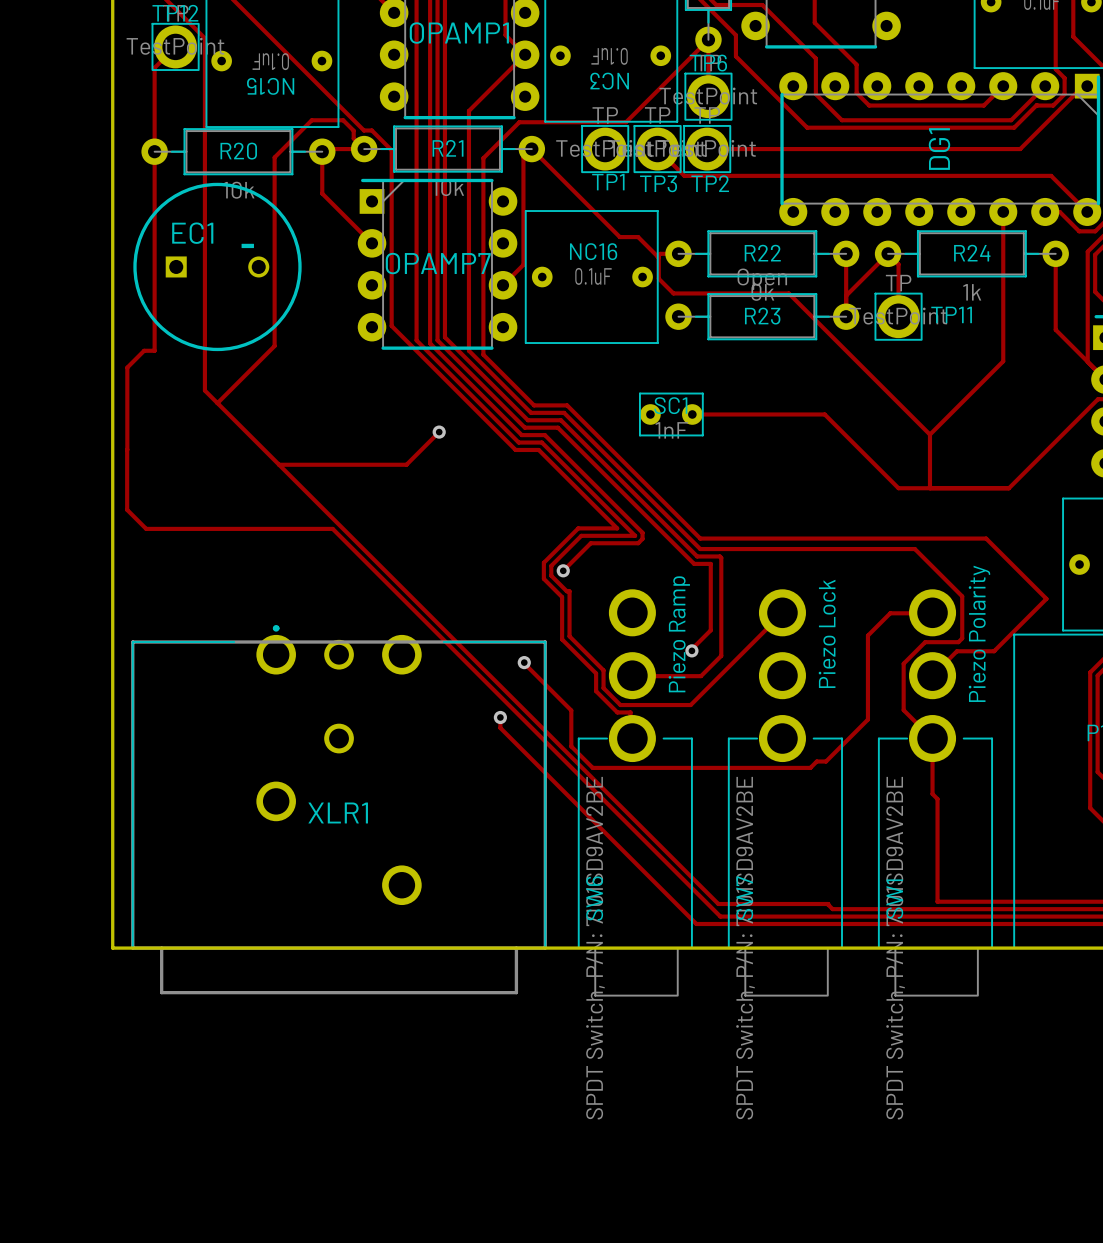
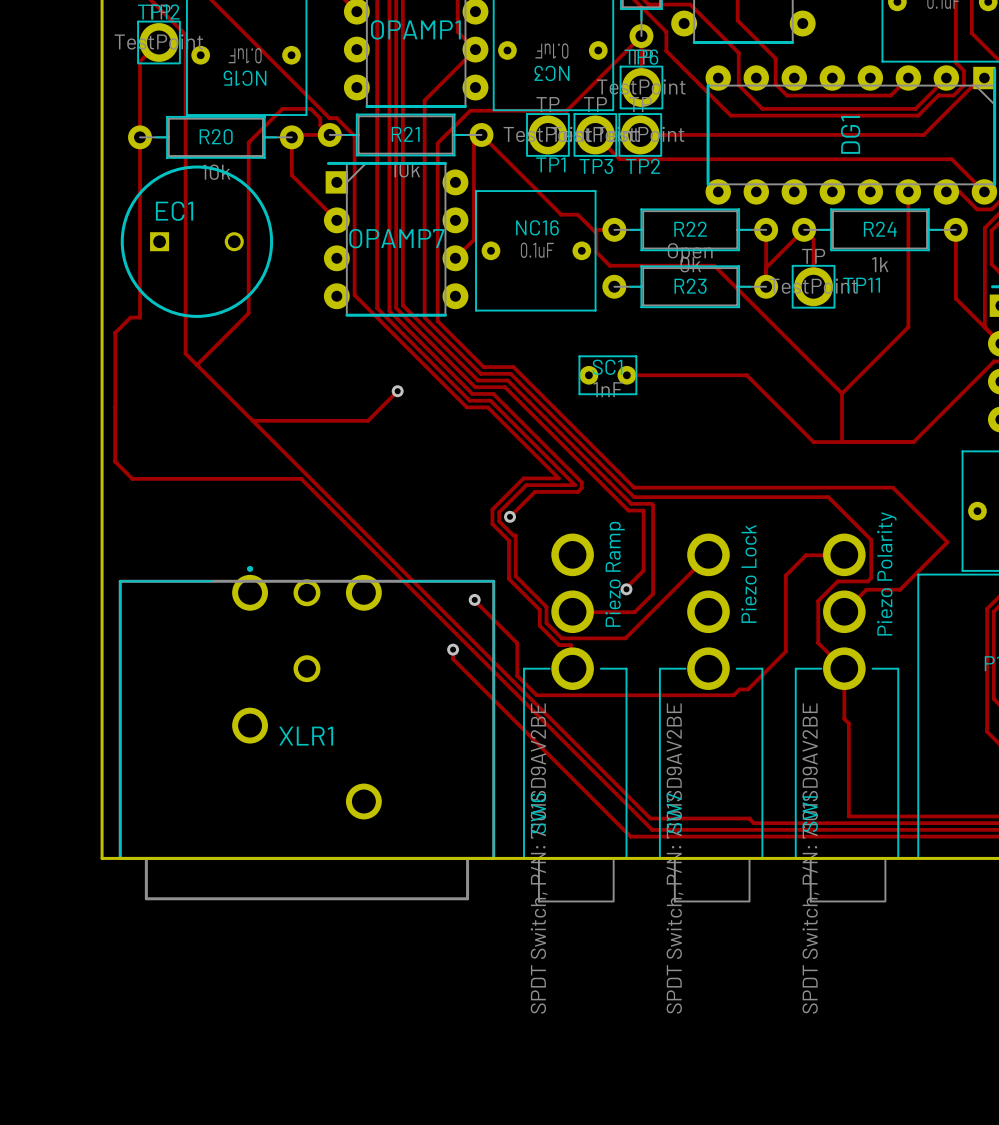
text: - (247, 245) -> none

